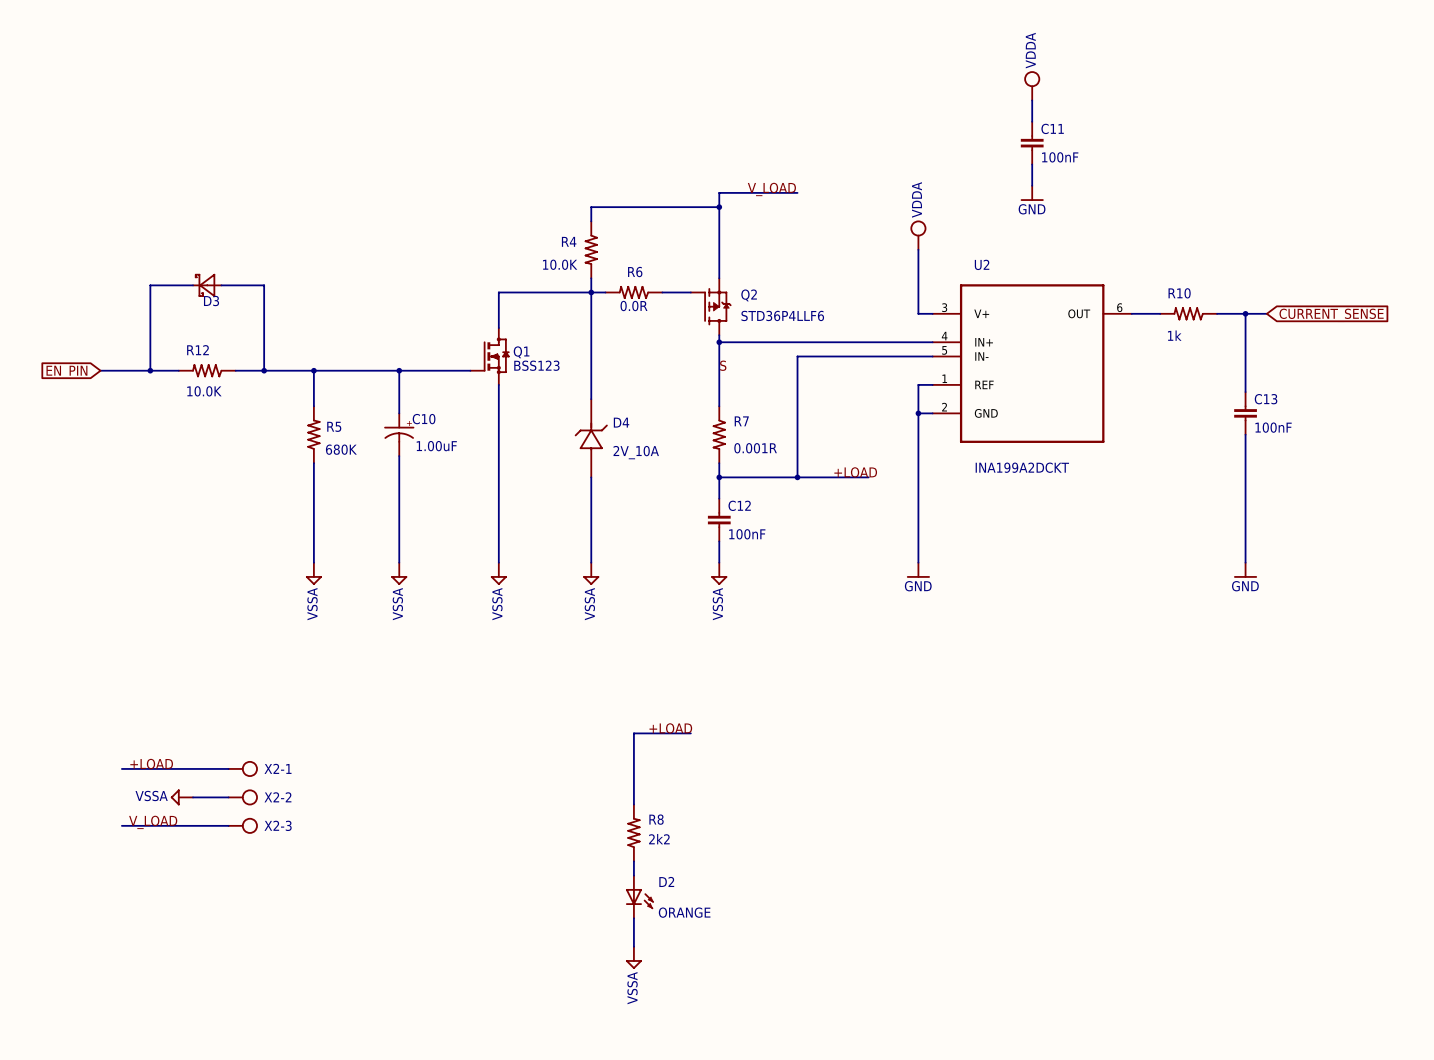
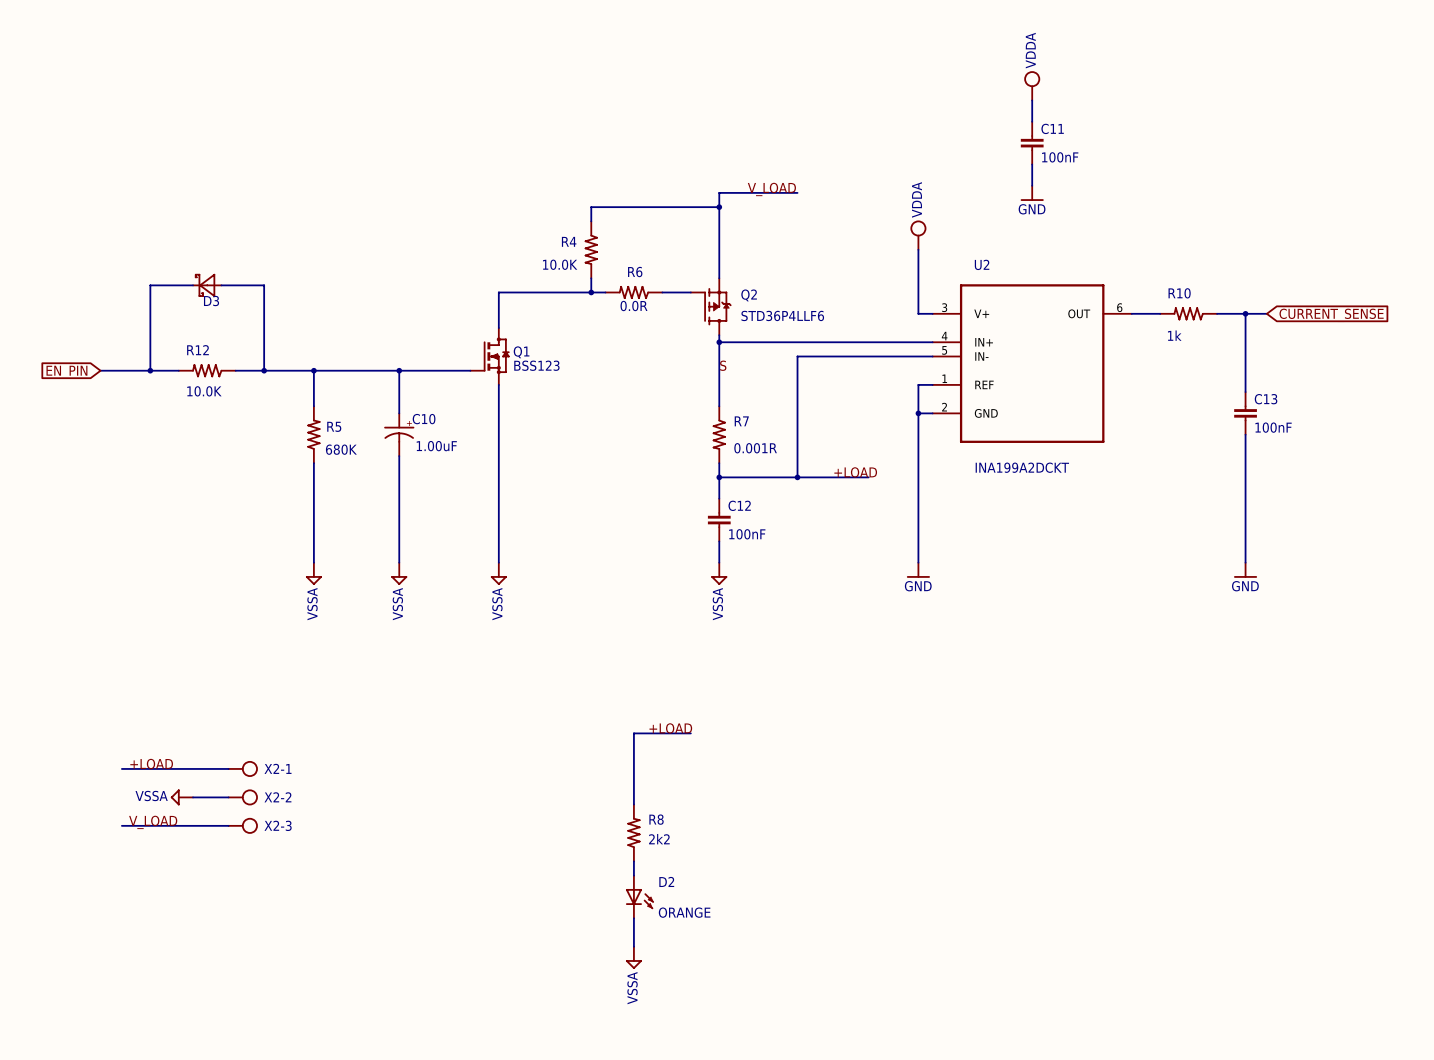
wire: (591, 292) (591, 399) -> none
text: D4 (621, 422) -> none
part: (591, 438) -> none
text: 2V_10A (636, 452) -> none
wire: (591, 477) (591, 562) -> none
power symbol: VSSA (591, 573) -> none

